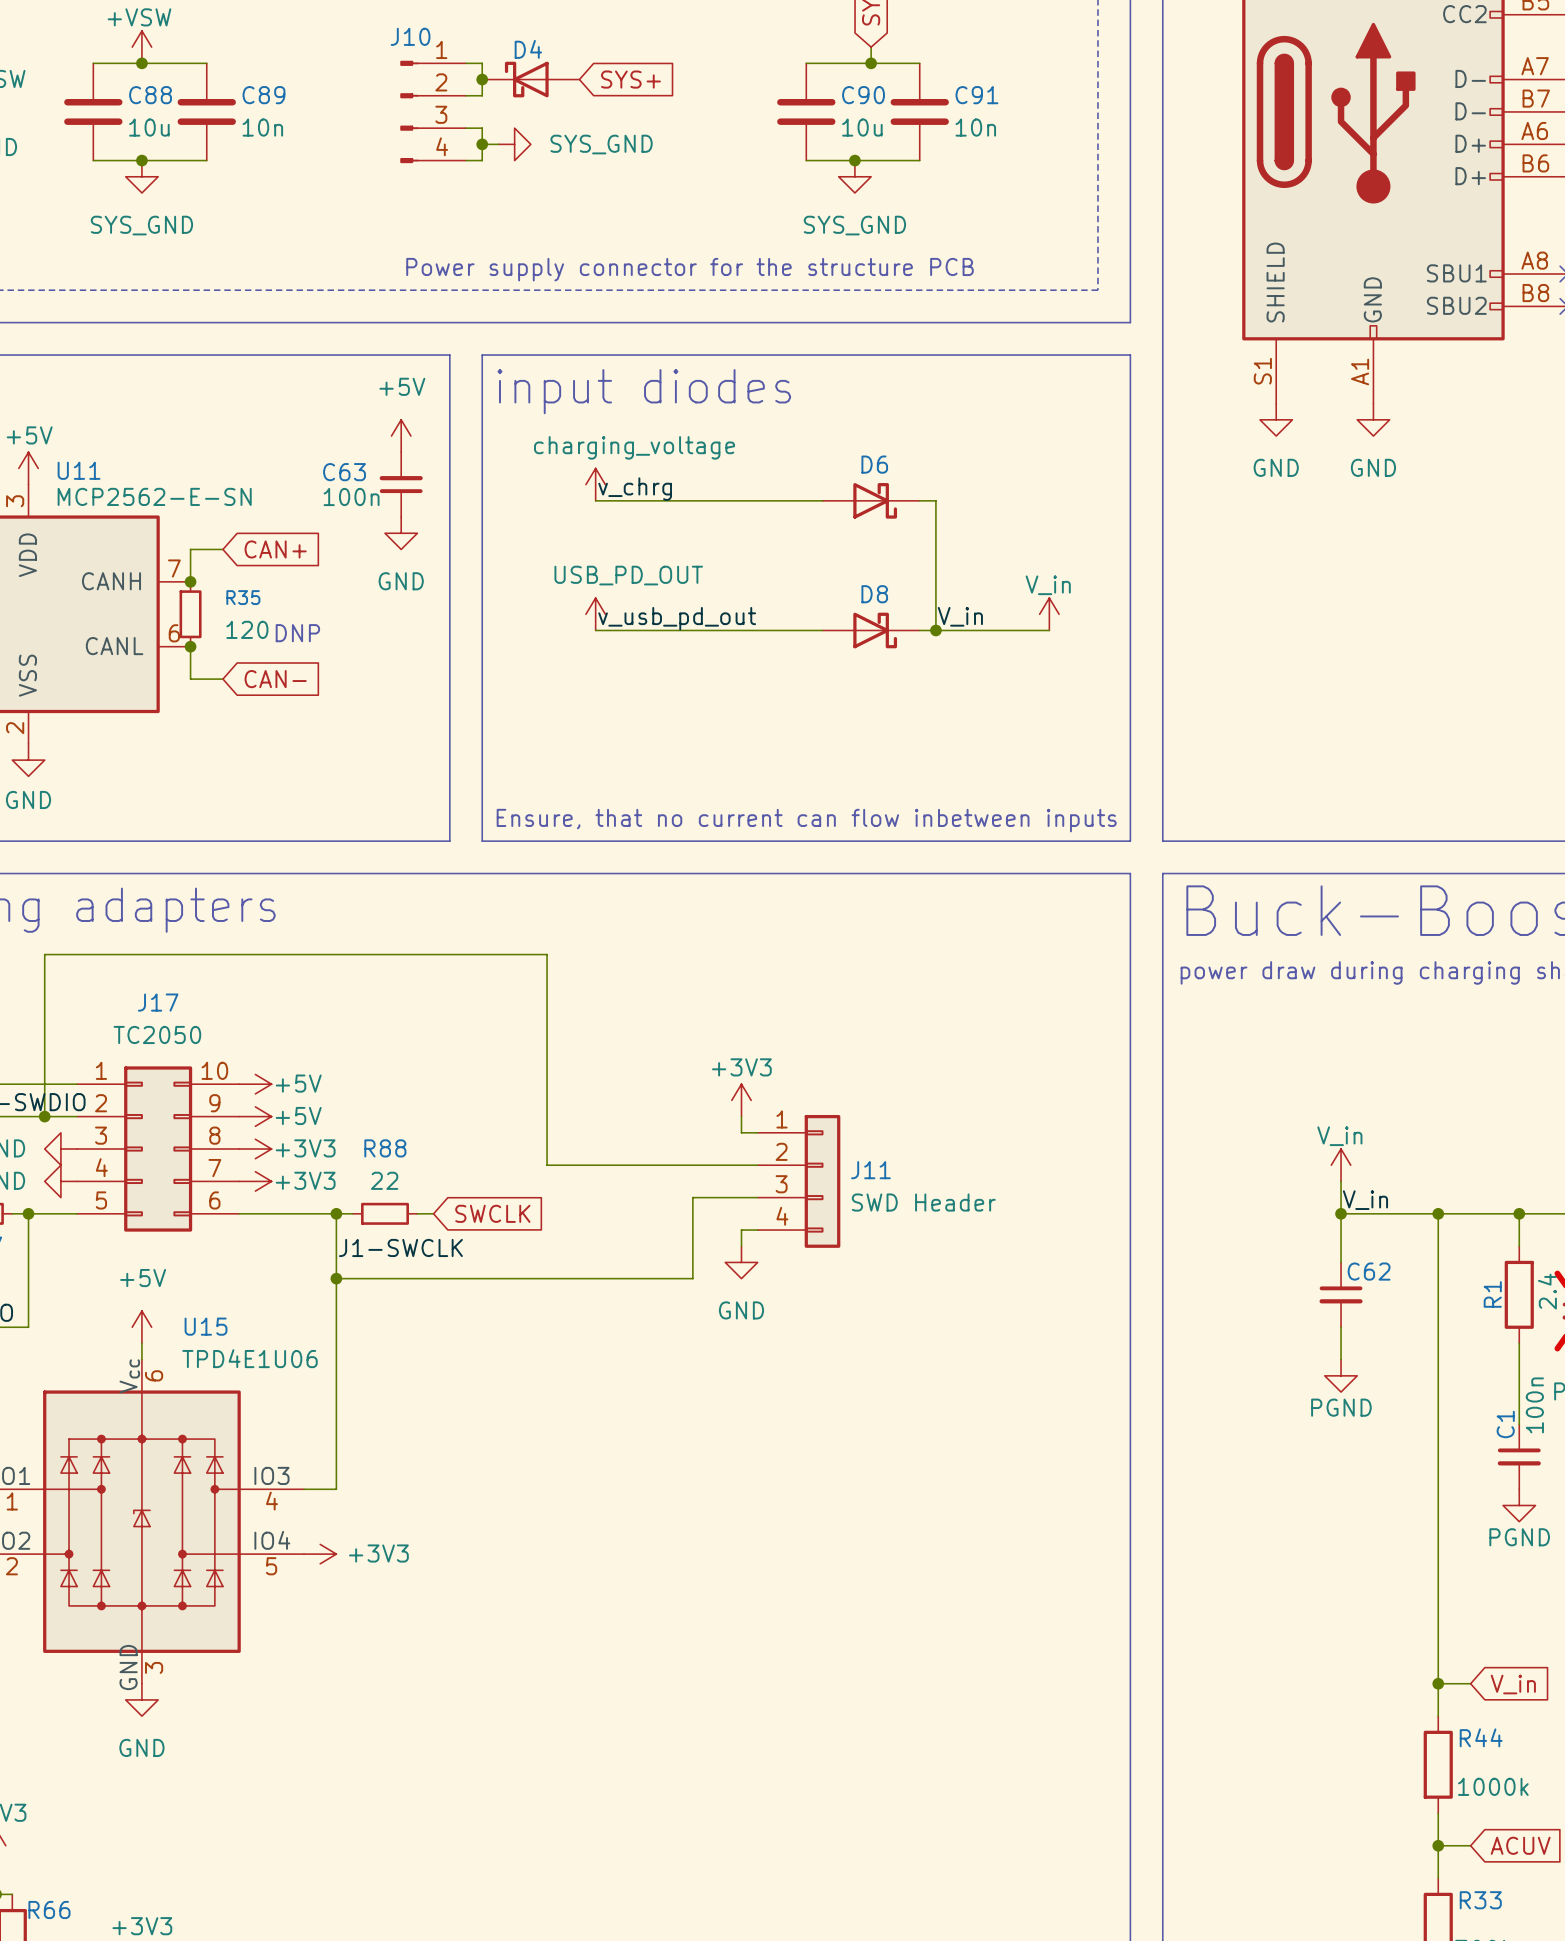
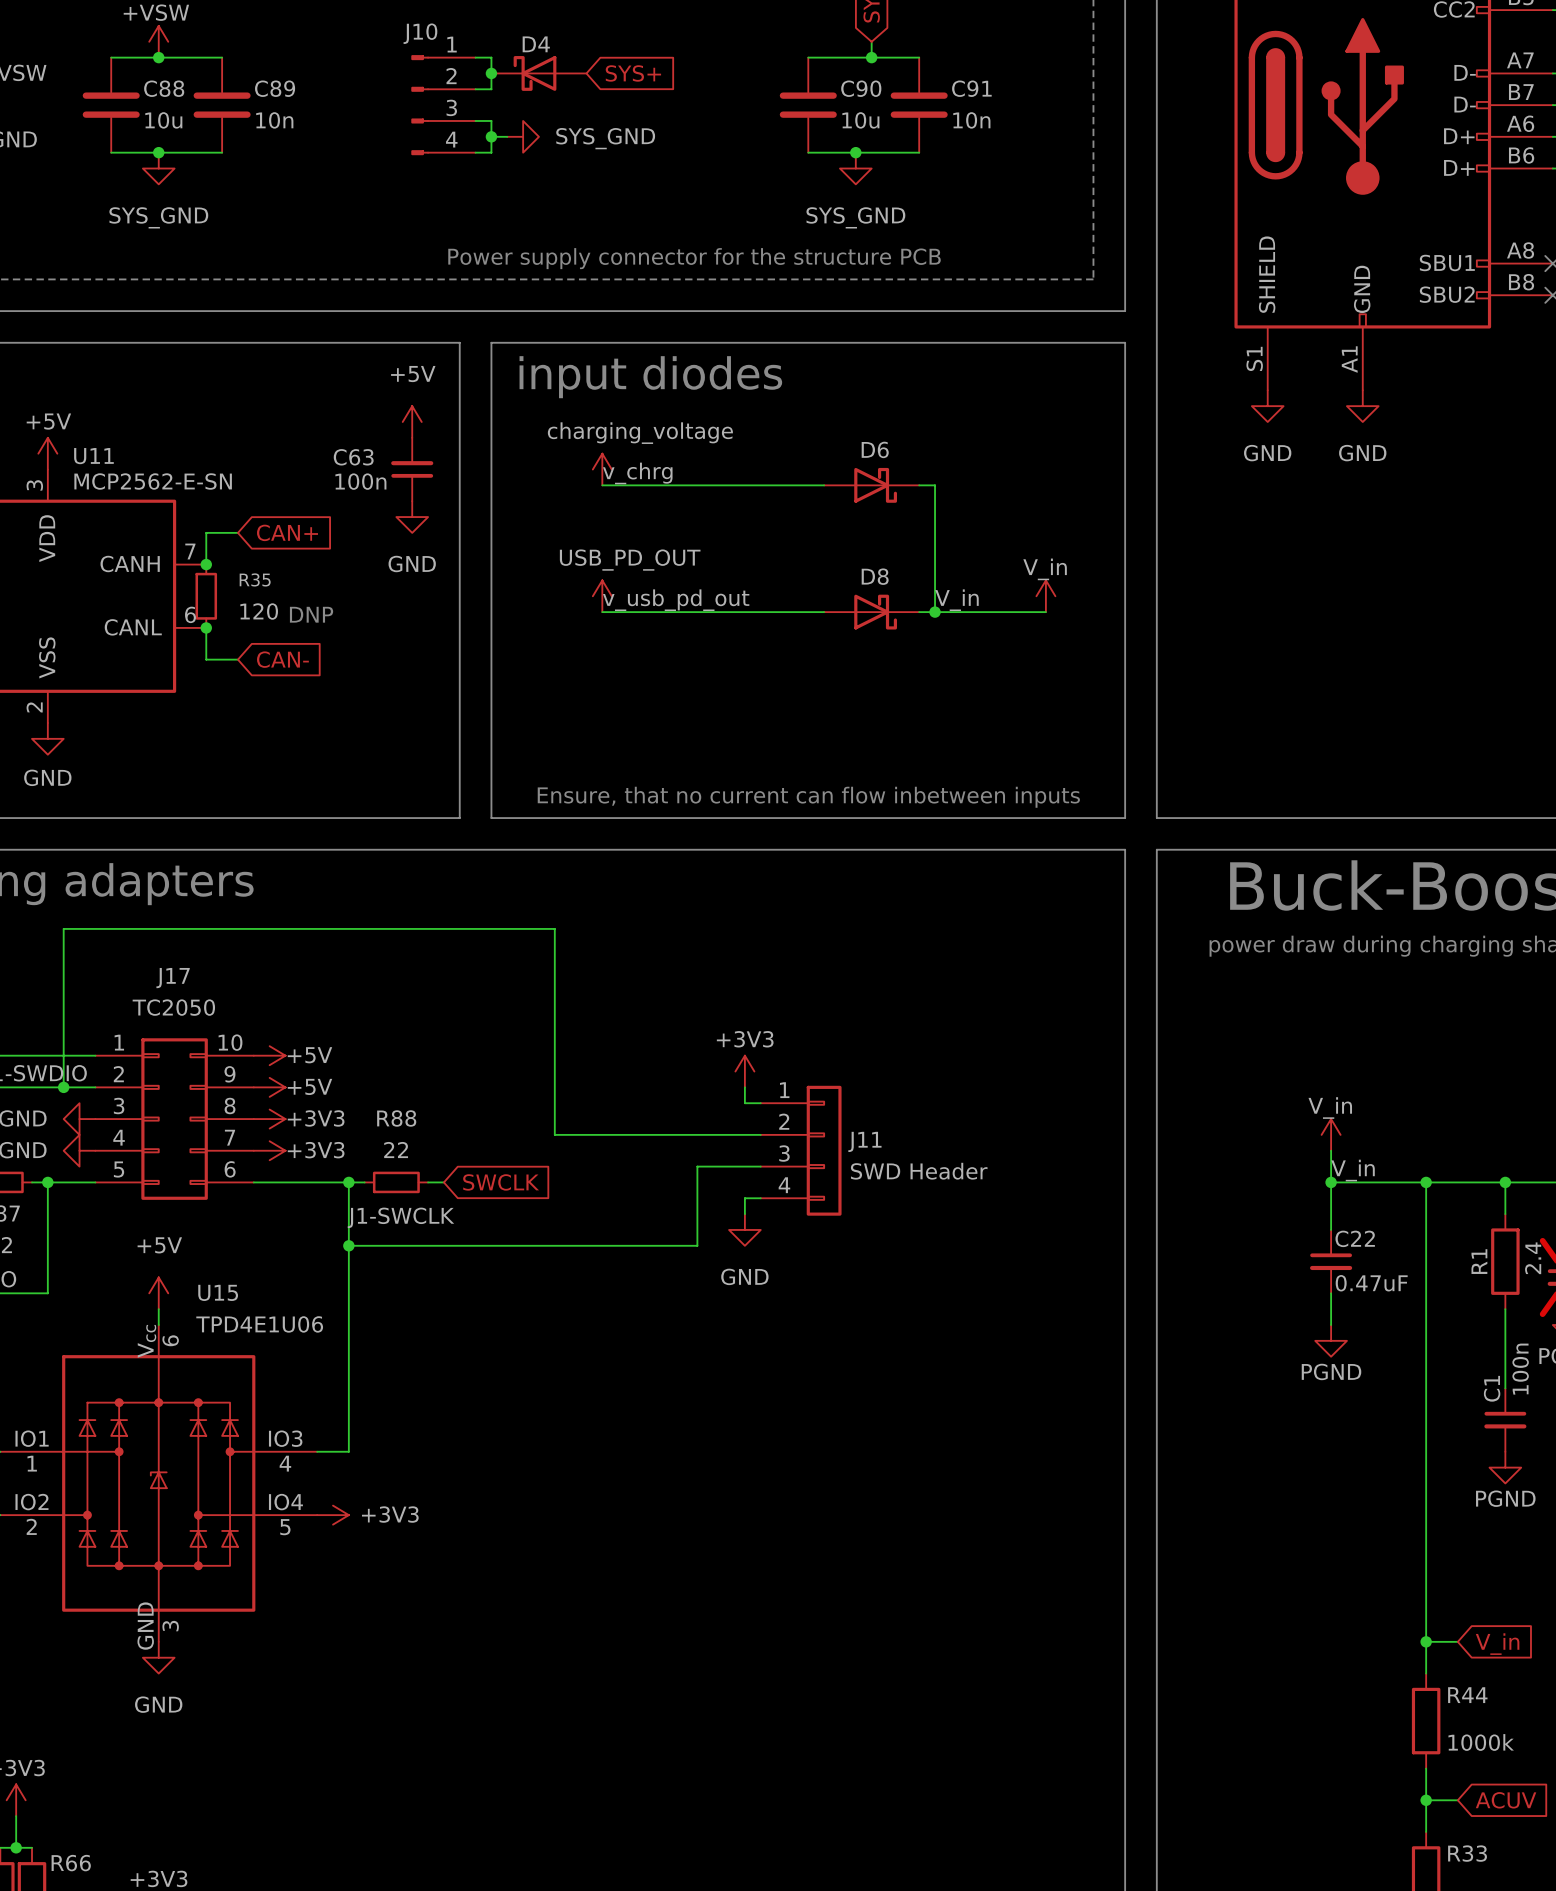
C62 name: C62 (1369, 1271) -> C22 (1355, 1238)
C62 value: none -> 0.47uF (1371, 1283)

